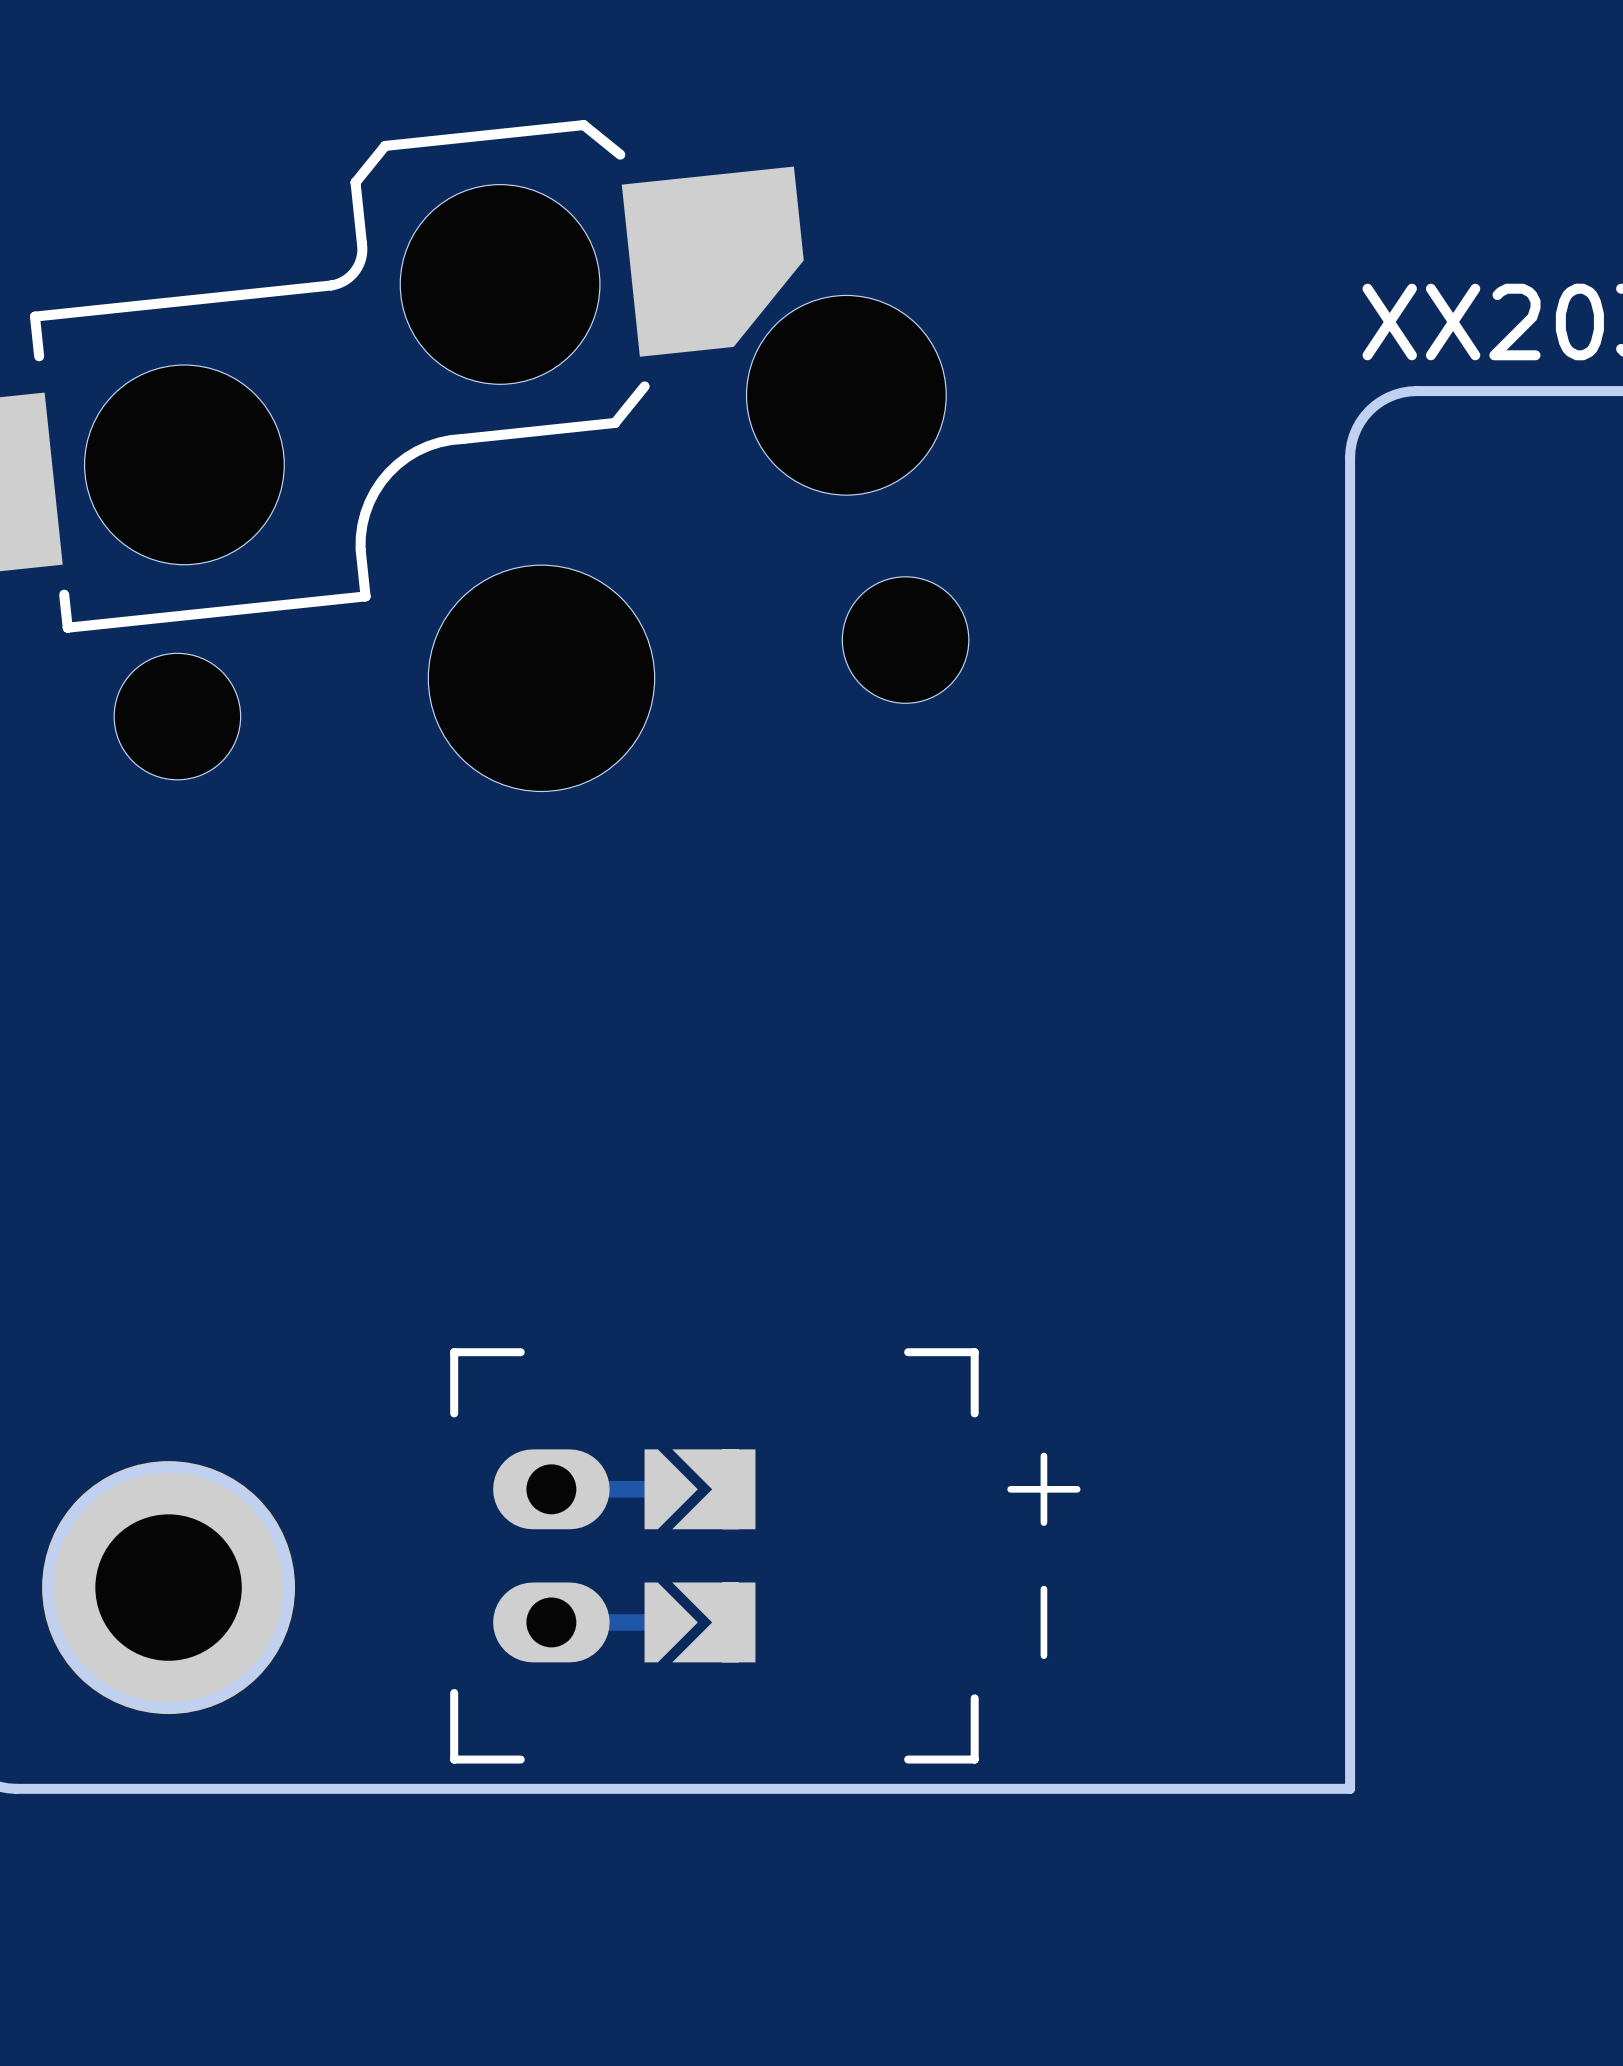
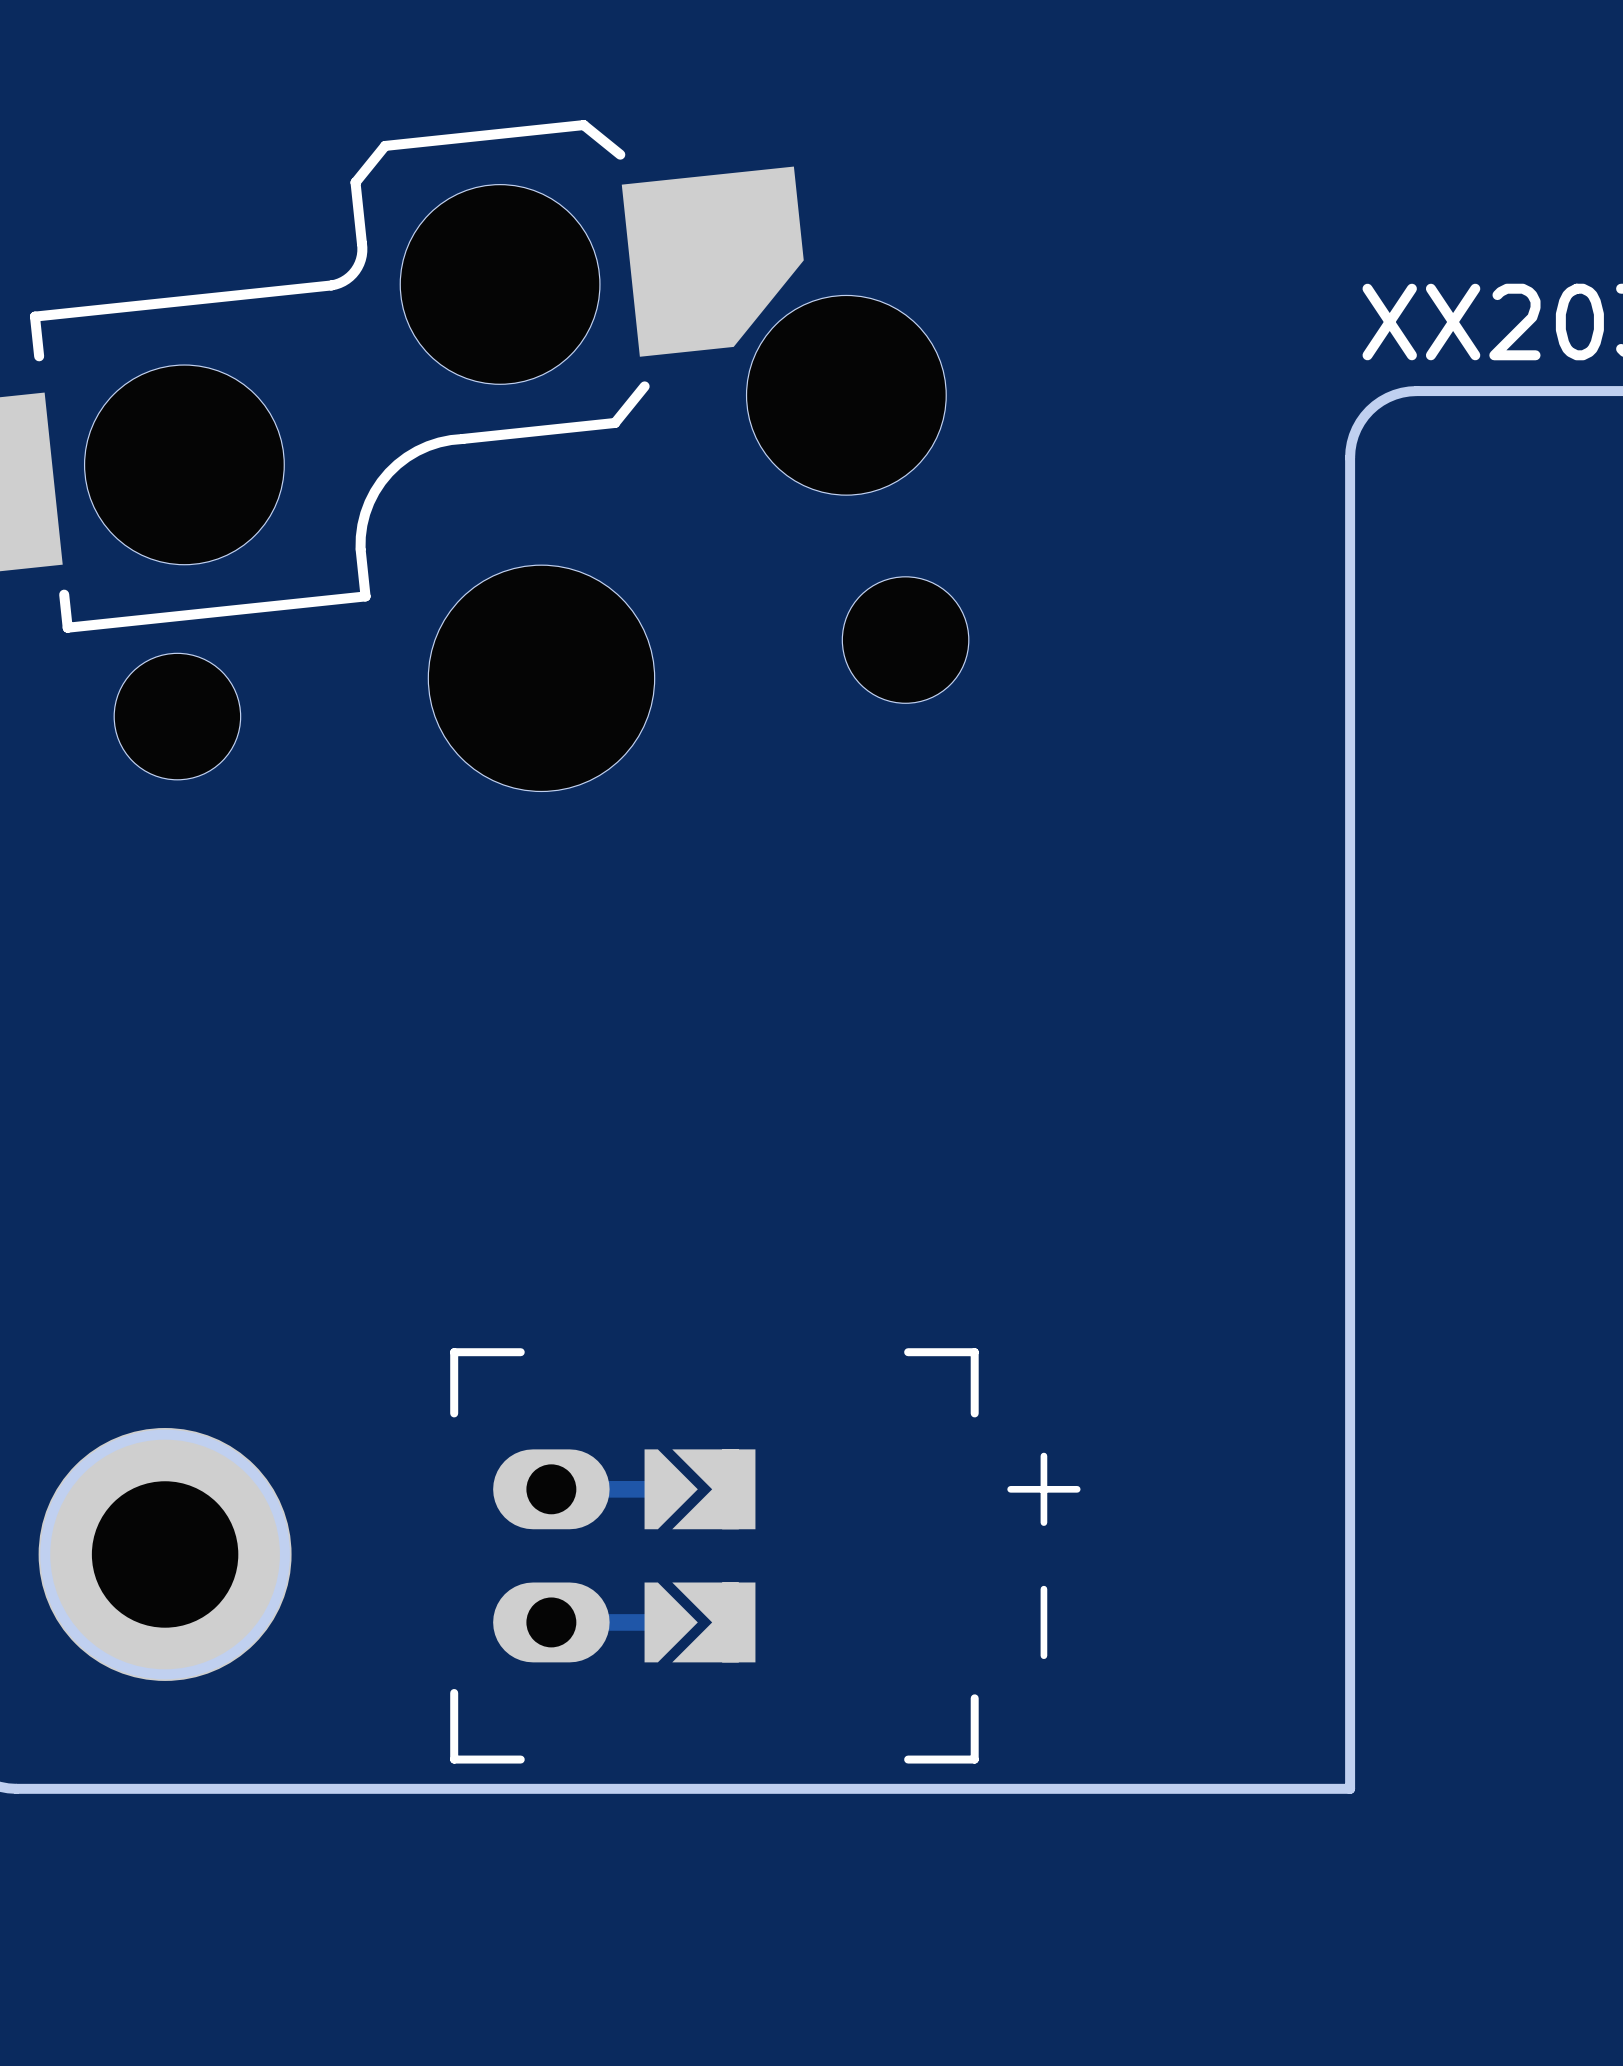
part position: (168, 1587) -> (165, 1554)

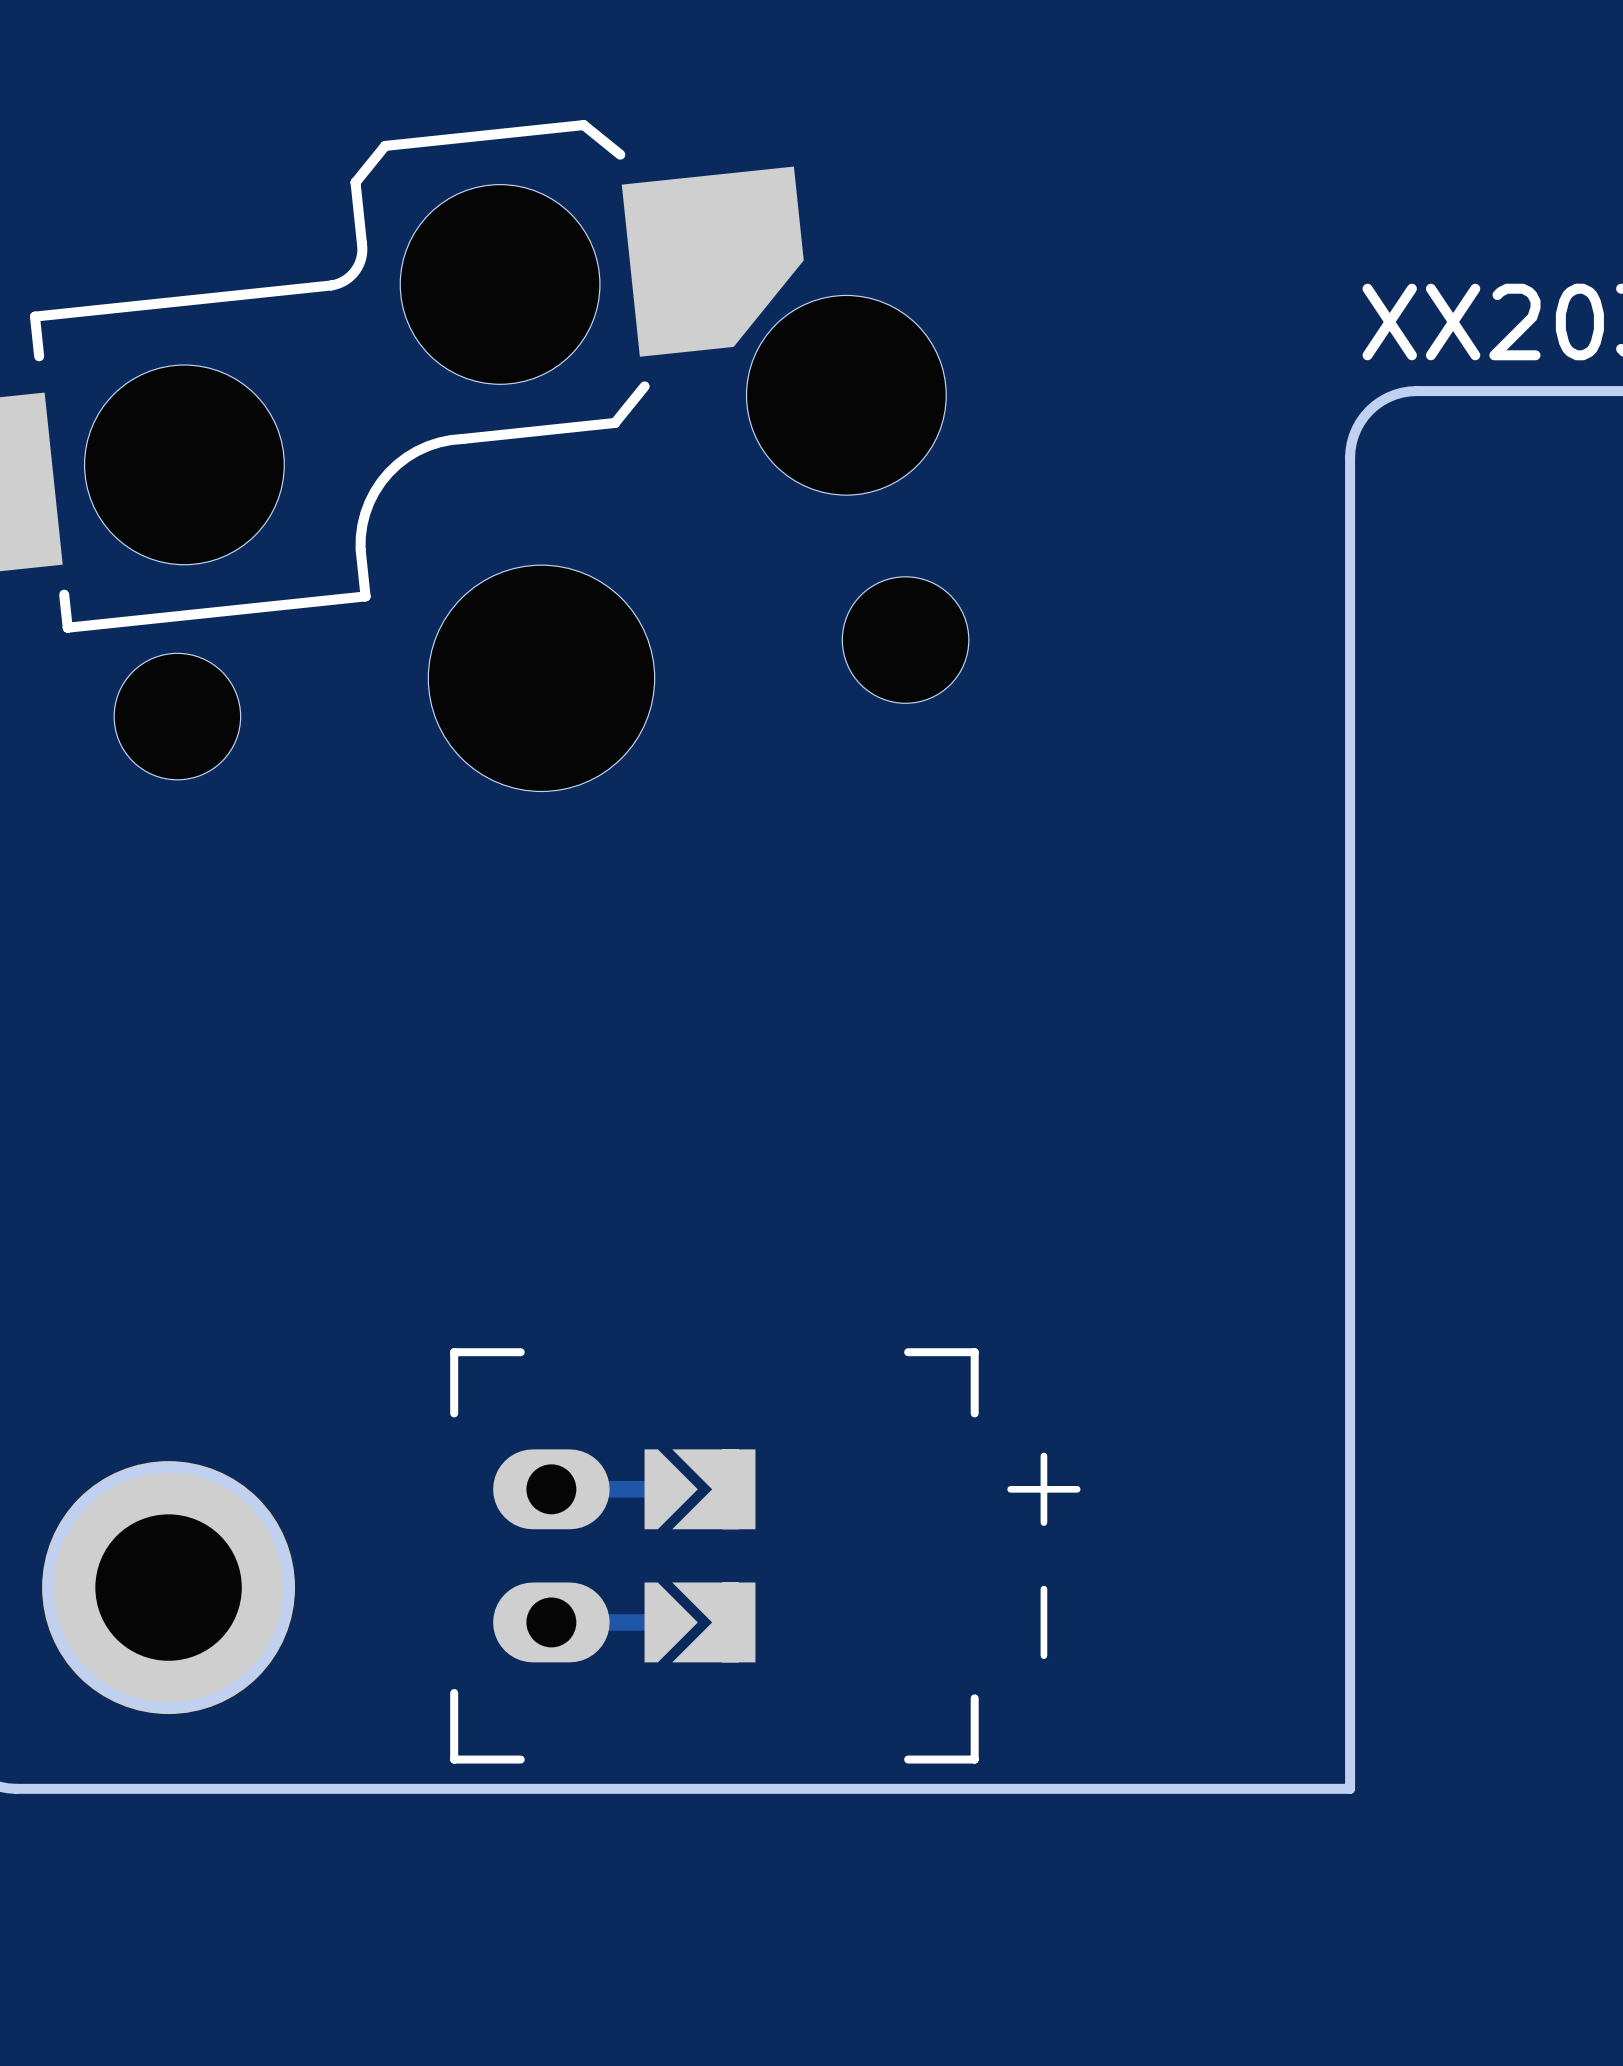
part position: (165, 1554) -> (168, 1587)

